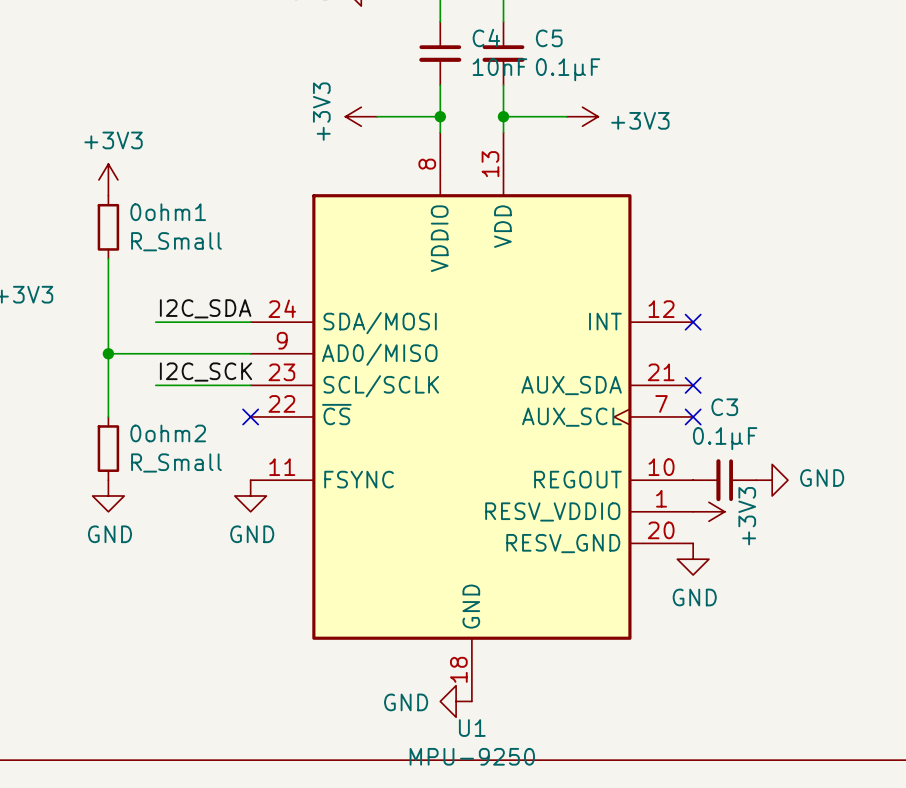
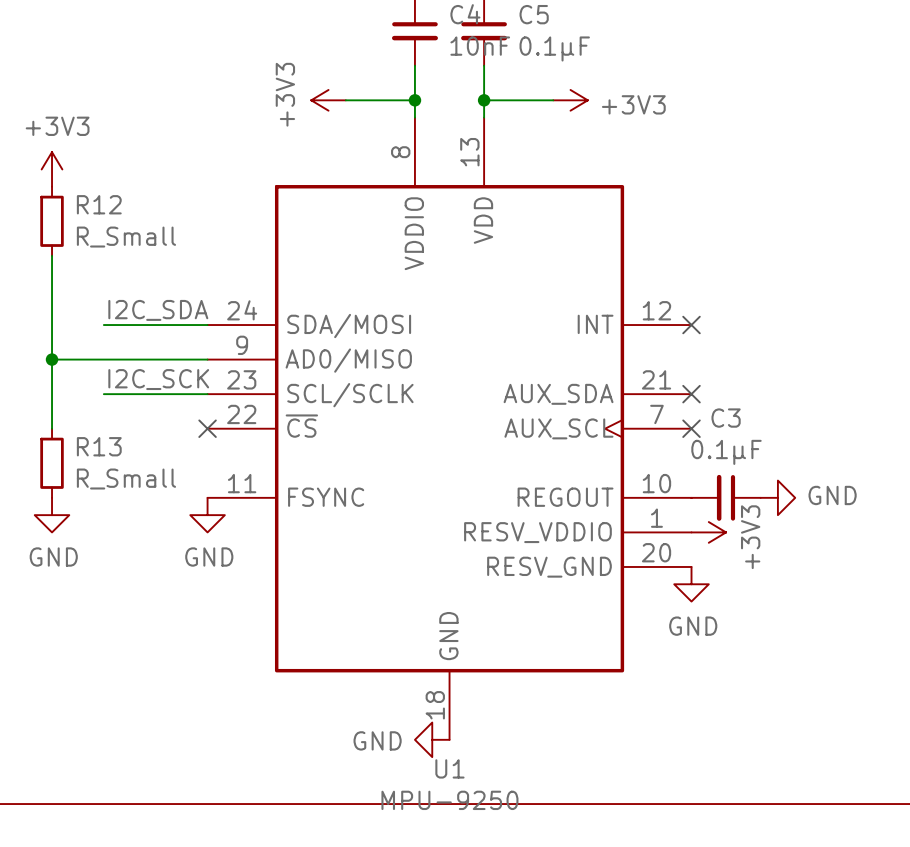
0ohm1 name: 0ohm1 (168, 212) -> R12 (99, 204)
0ohm2 name: 0ohm2 (168, 433) -> R13 (99, 446)

